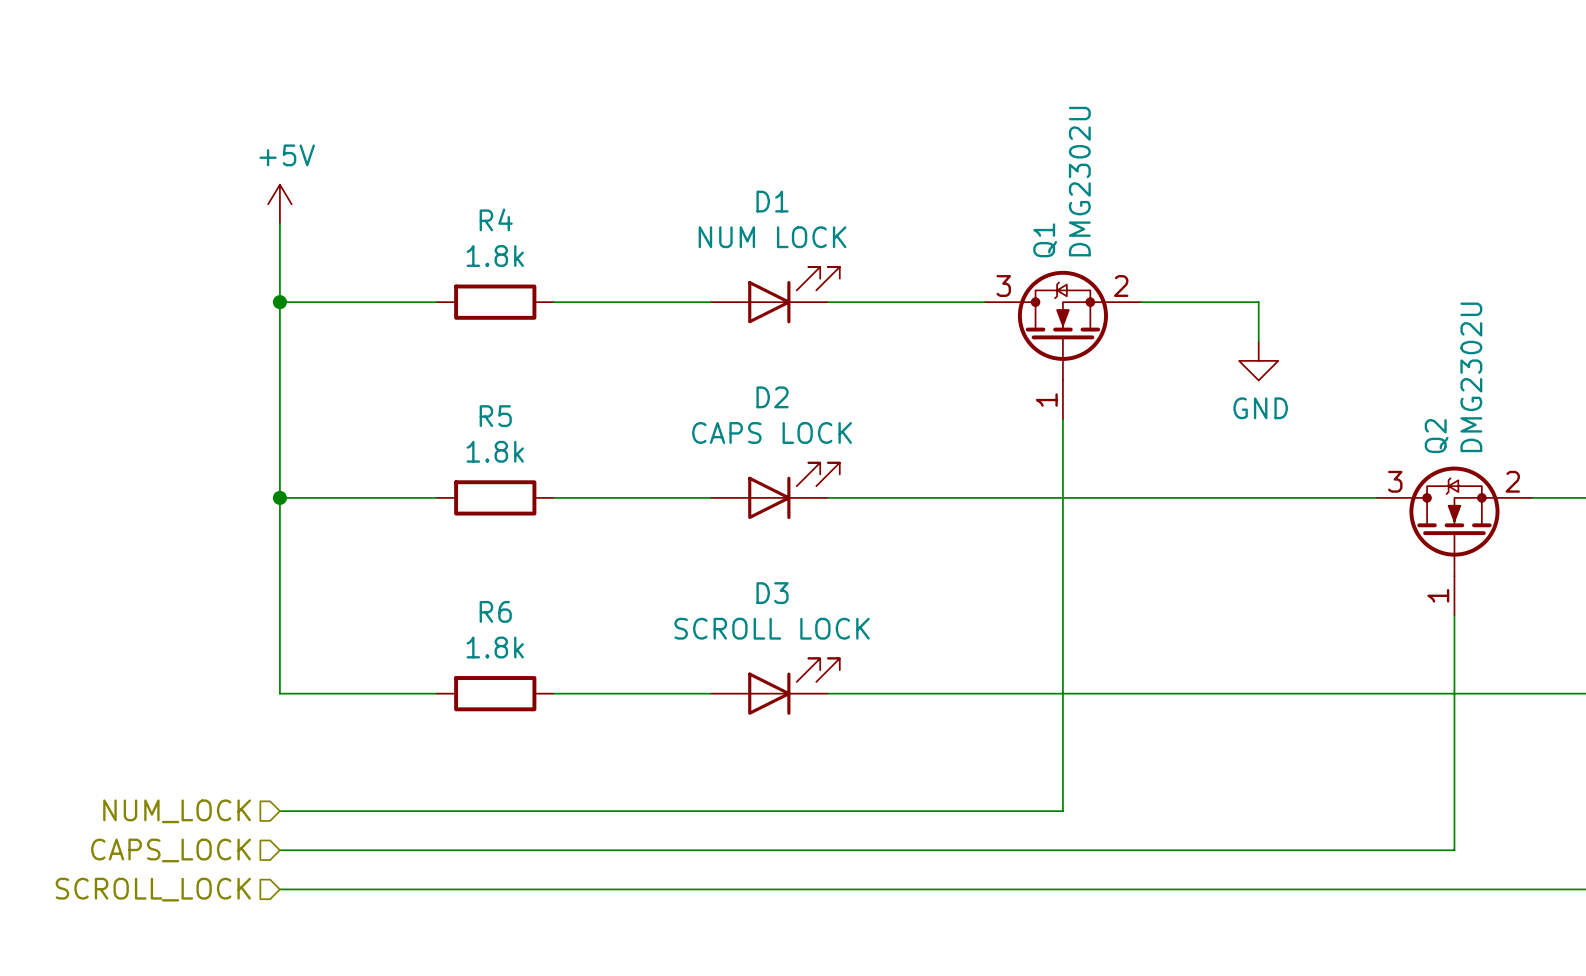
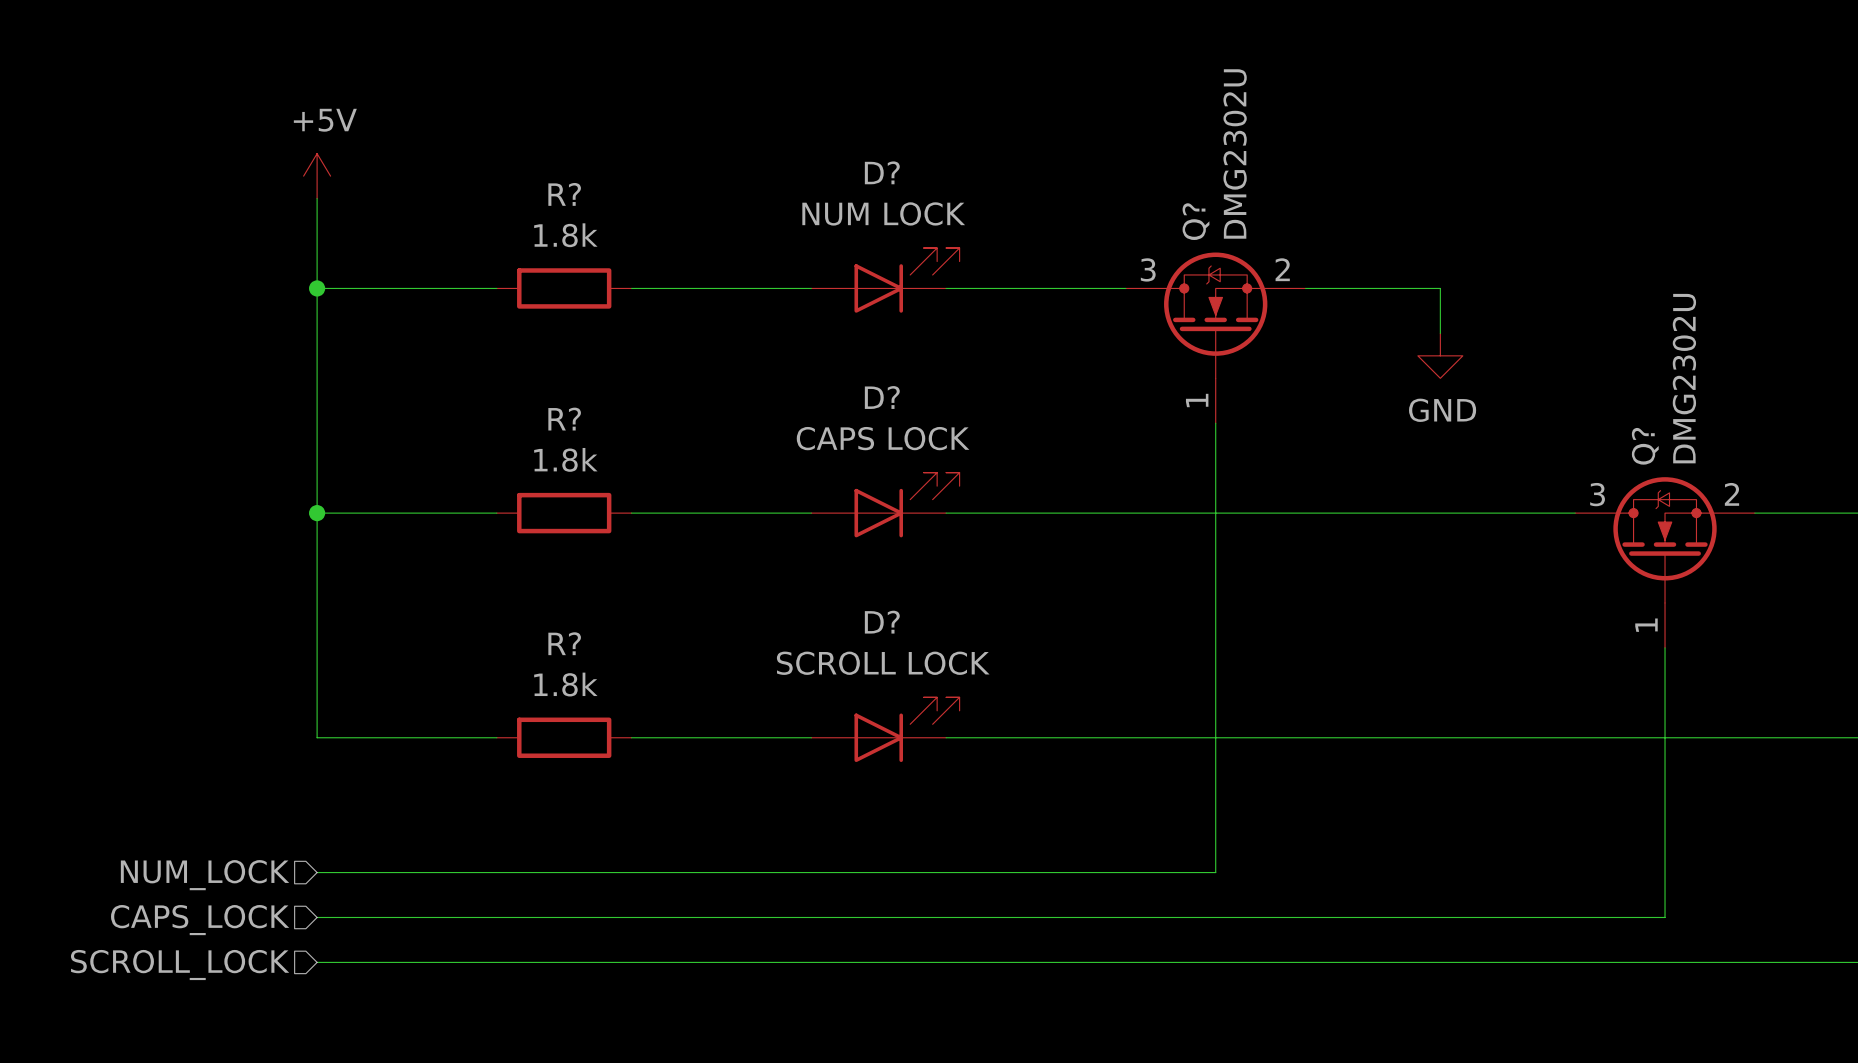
D1 name: D1 (772, 201) -> D? (882, 172)
R4 name: R4 (496, 219) -> R? (564, 194)
Q1 name: Q1 (1045, 240) -> Q? (1195, 221)
D2 name: D2 (772, 397) -> D? (882, 397)
R5 name: R5 (495, 416) -> R? (564, 419)
Q2 name: Q2 (1436, 436) -> Q? (1645, 446)
D3 name: D3 (772, 593) -> D? (882, 622)
R6 name: R6 (495, 611) -> R? (564, 643)

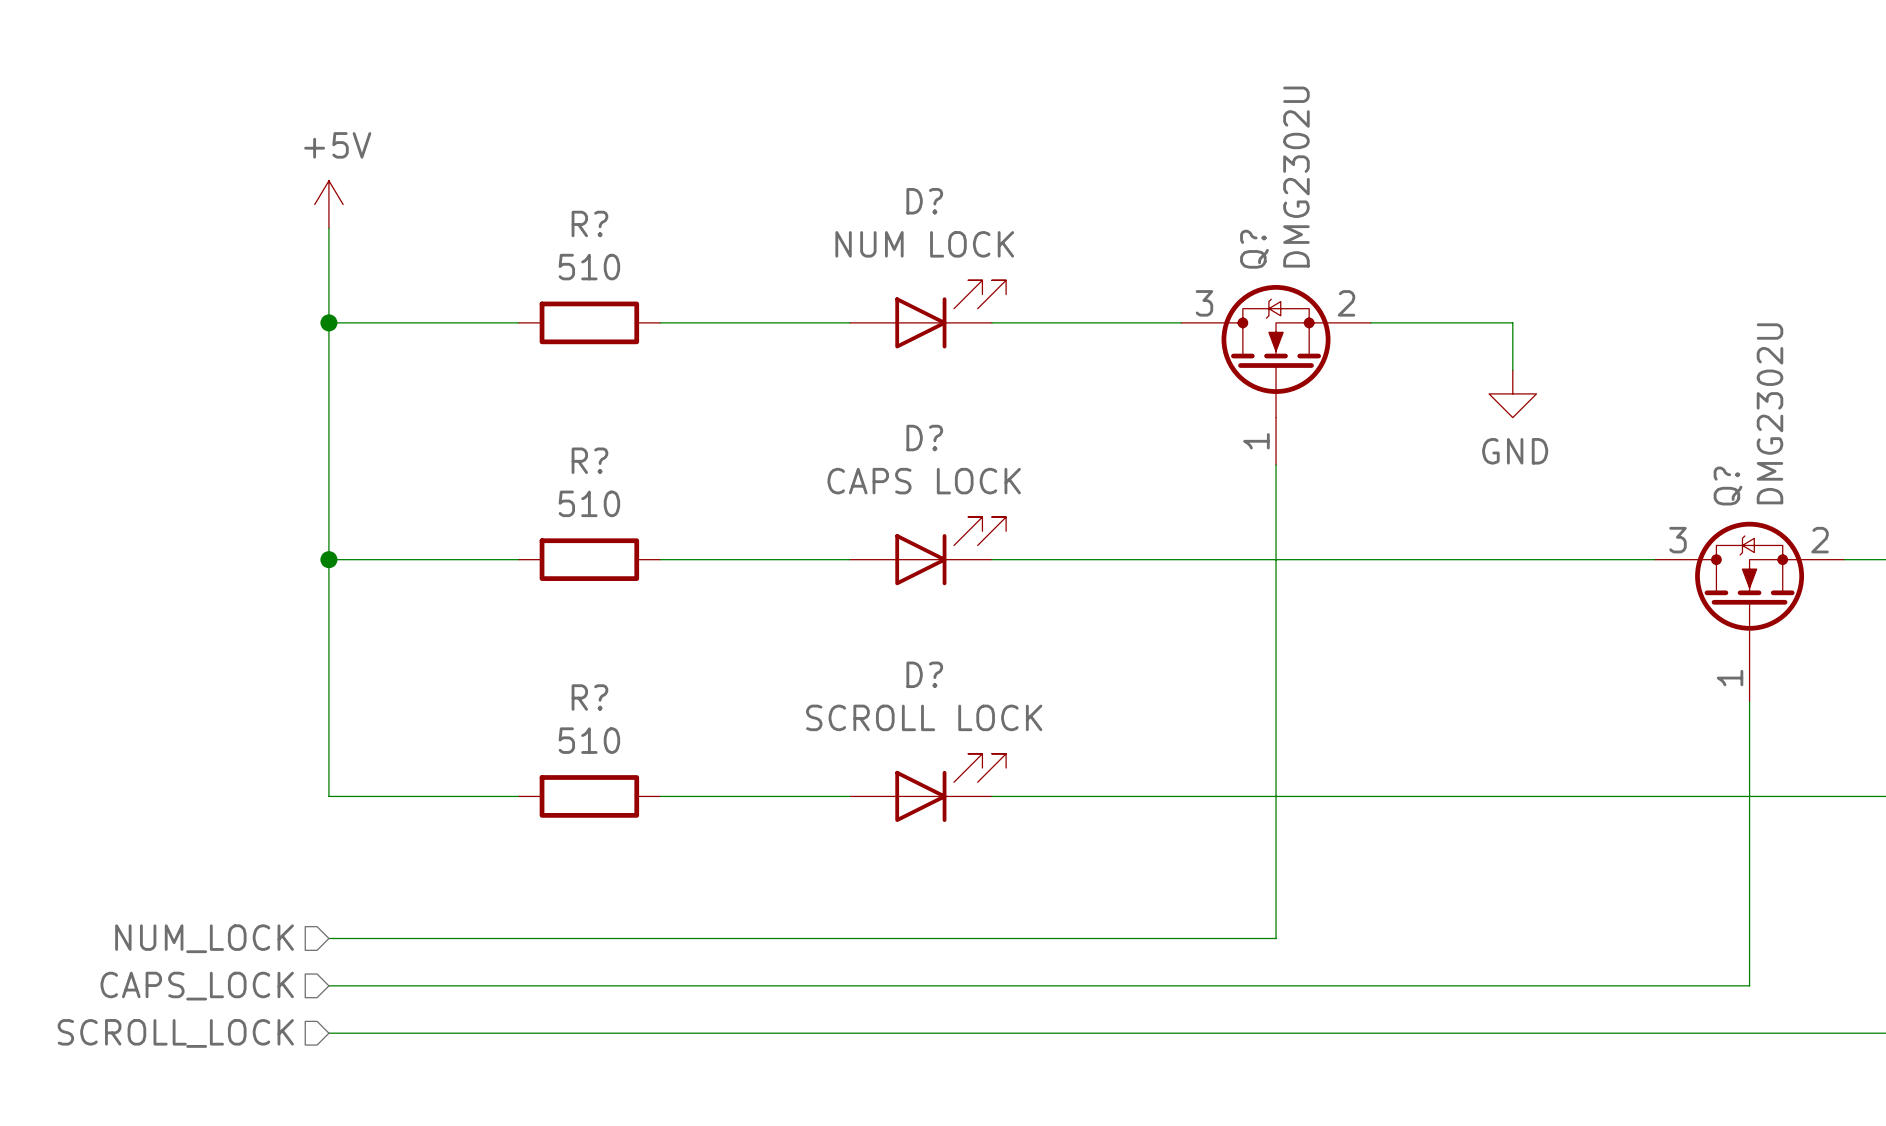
R? value: 1.8k (565, 235) -> 510 (589, 267)
R? value: 1.8k (565, 459) -> 510 (589, 503)
R? value: 1.8k (565, 684) -> 510 (589, 740)

